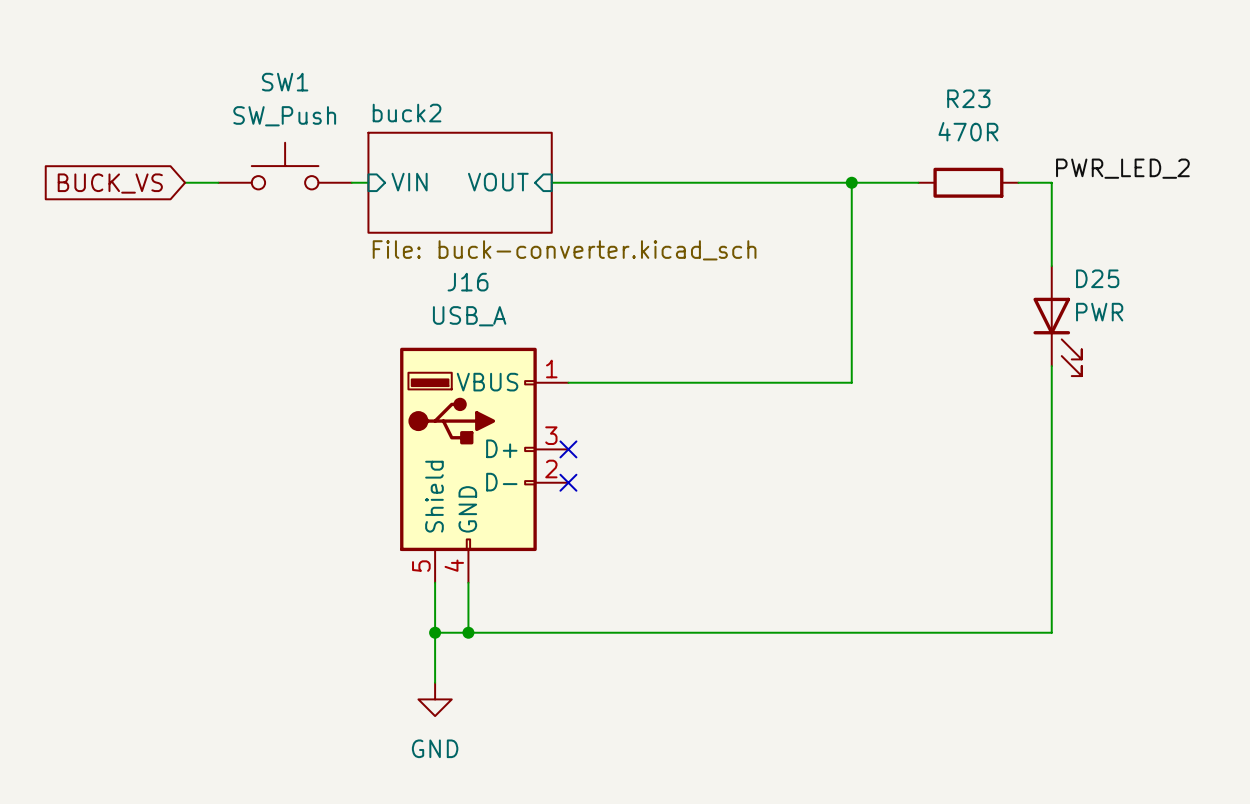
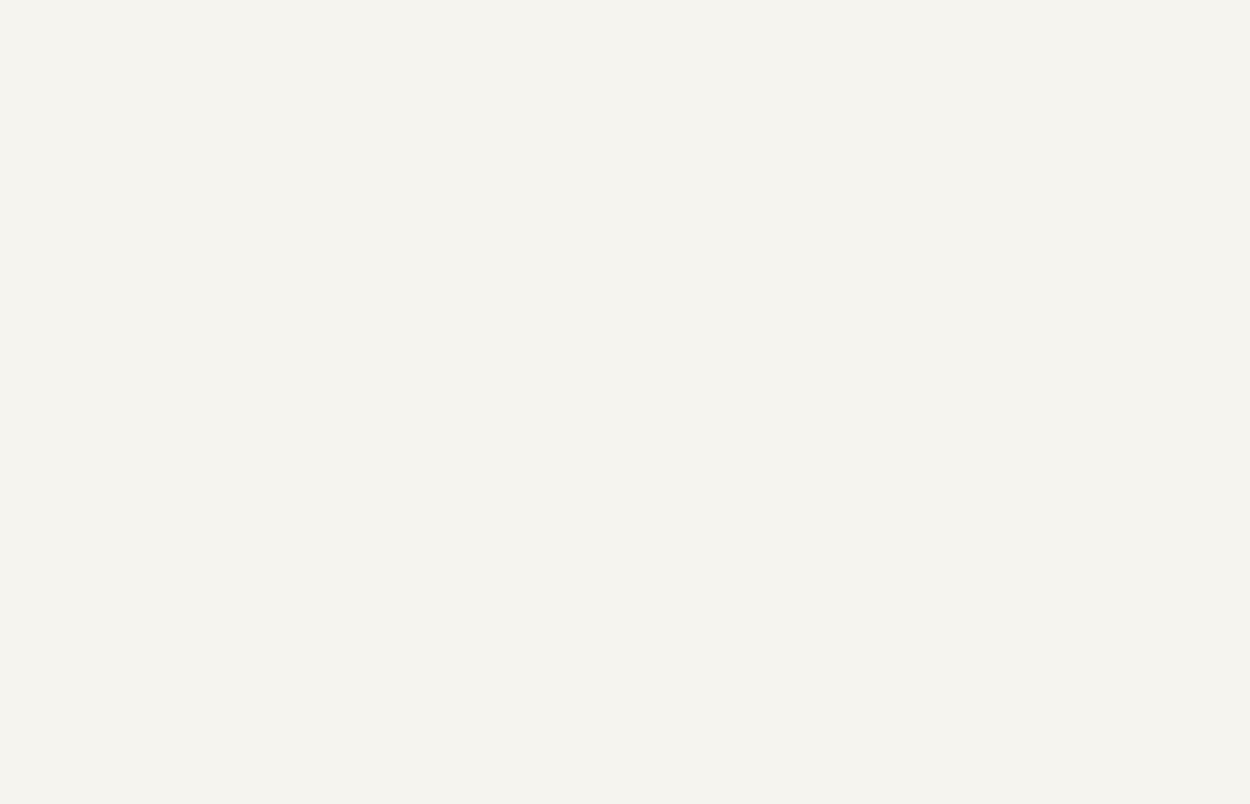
SW1: SW_Push (285, 166) -> none
label: PWR_LED_2 (1122, 168) -> none
wire: (185, 182) (218, 182) -> none
wire: (351, 182) (368, 182) -> none
sheet pin: VIN (409, 182) -> none
sheet buck2: File: buck-converter.kicad_sch (460, 182) -> none
sheet pin: VOUT (498, 182) -> none
wire: (551, 182) (918, 182) -> none
wire: (851, 182) (851, 382) (568, 382) -> none
junction: (851, 182) -> none
R23: 470R (968, 182) -> none
wire: (1018, 182) (1051, 182) (1051, 266) -> none
global label: BUCK_VS (110, 183) -> none
D25: PWR (1057, 321) -> none
wire: (1051, 366) (1051, 632) (435, 632) -> none
no-connect mark: (568, 449) -> none
J16: USB_A (484, 465) -> none
no-connect mark: (568, 482) -> none
wire: (435, 582) (435, 682) -> none
wire: (468, 582) (468, 632) -> none
junction: (435, 632) -> none
junction: (468, 632) -> none
power symbol: GND (435, 699) -> none

